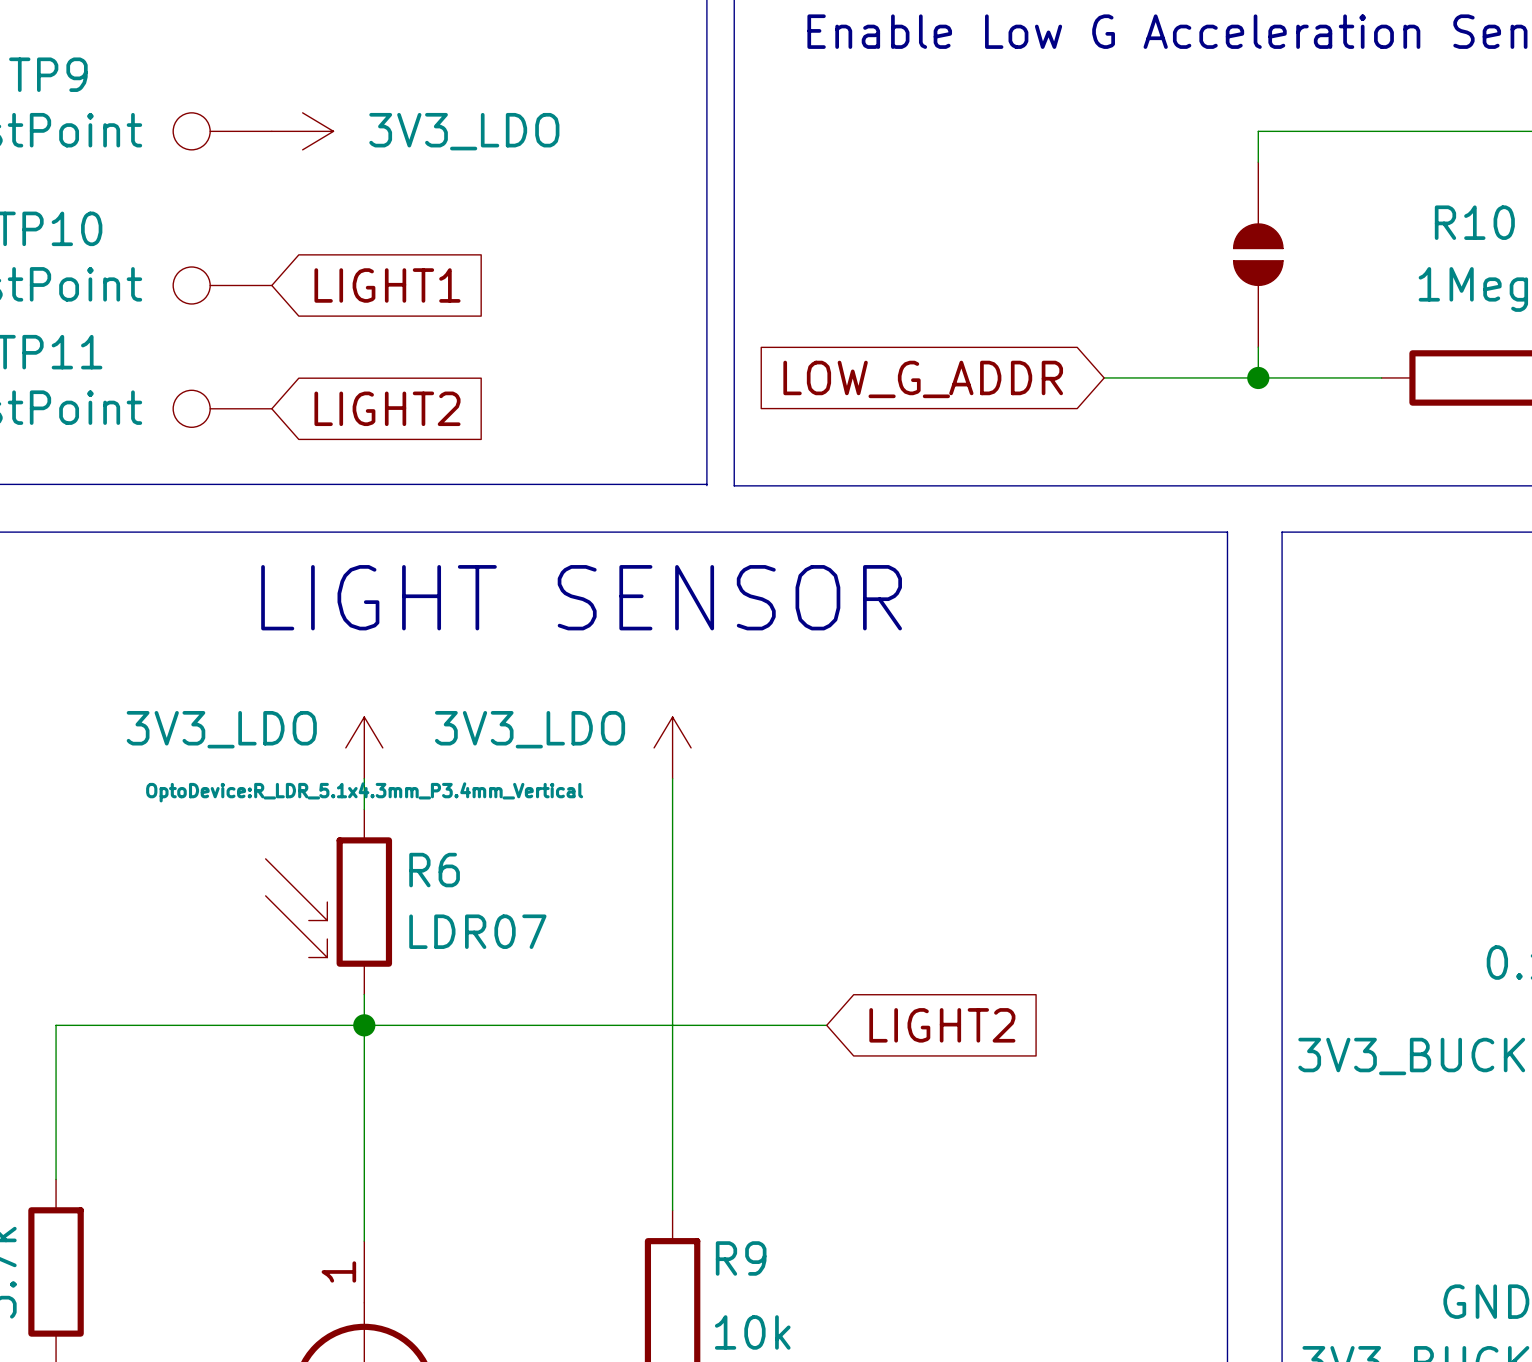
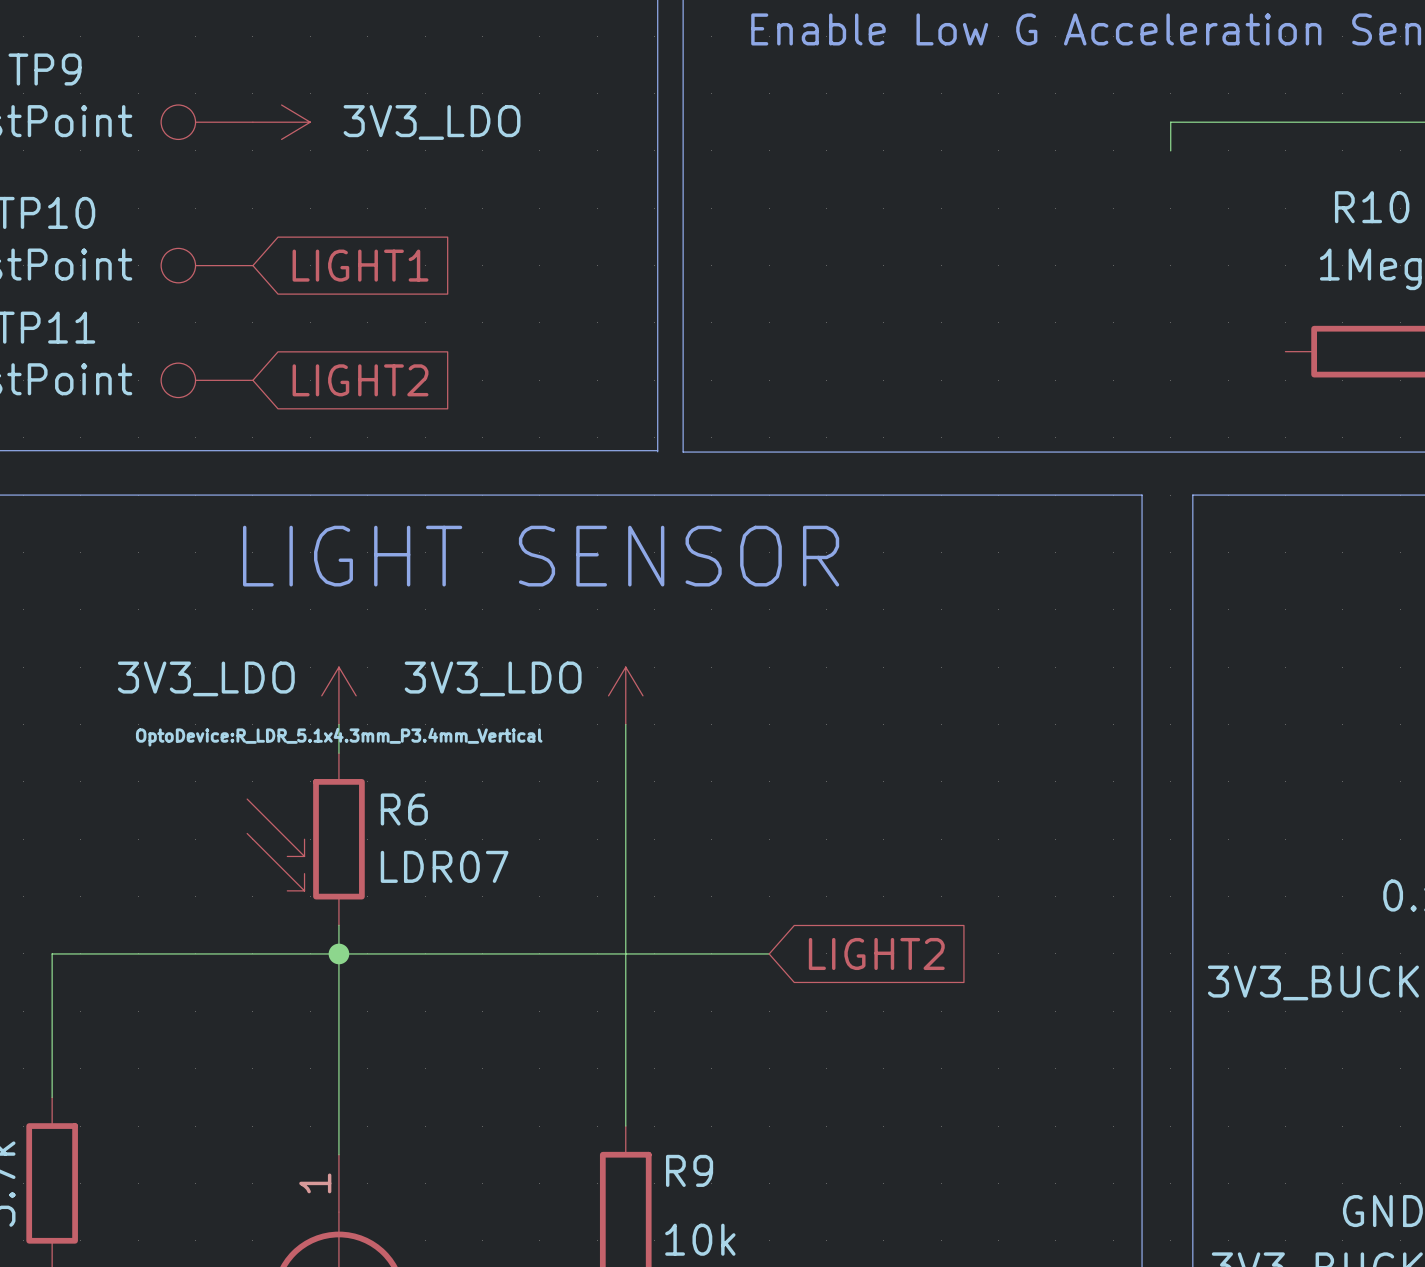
part: (1258, 254) -> none
wire: (1258, 347) (1258, 377) -> none
wire: (1104, 377) (1381, 377) -> none
junction: (1258, 377) -> none
global label: LOW_G_ADDR (923, 379) -> none

